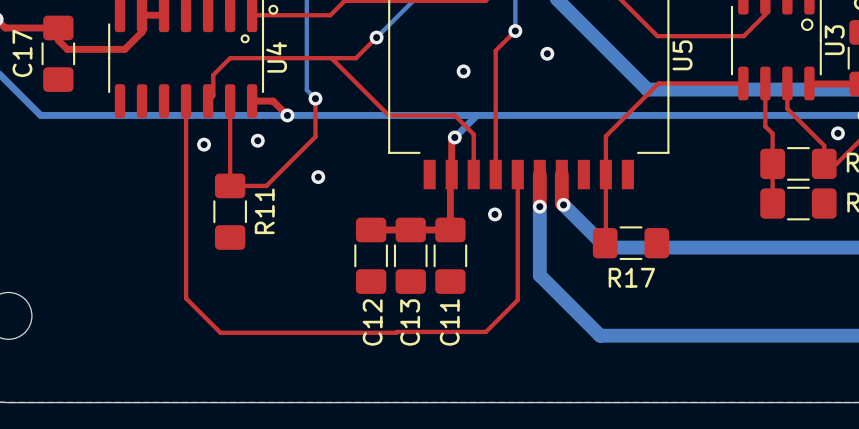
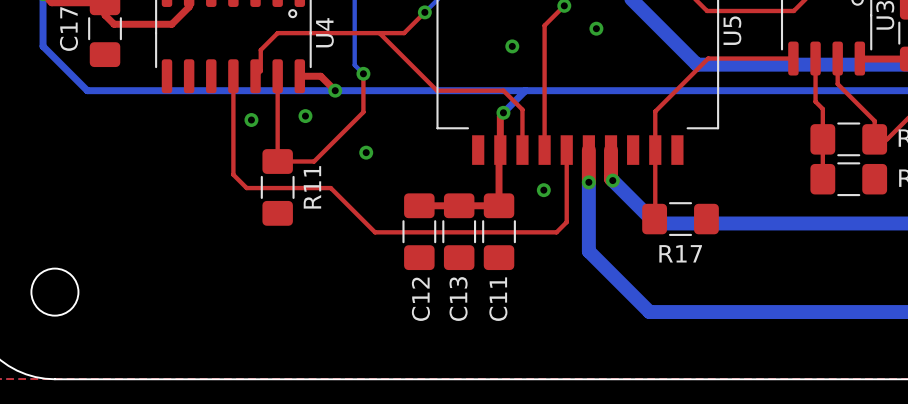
via: (837, 133) -> none
top track: (186, 199) (186, 298) (220, 332) (485, 331) (517, 300) (517, 246) -> (233, 174) (246, 188) (330, 188) (375, 232) (556, 232) (566, 222)

